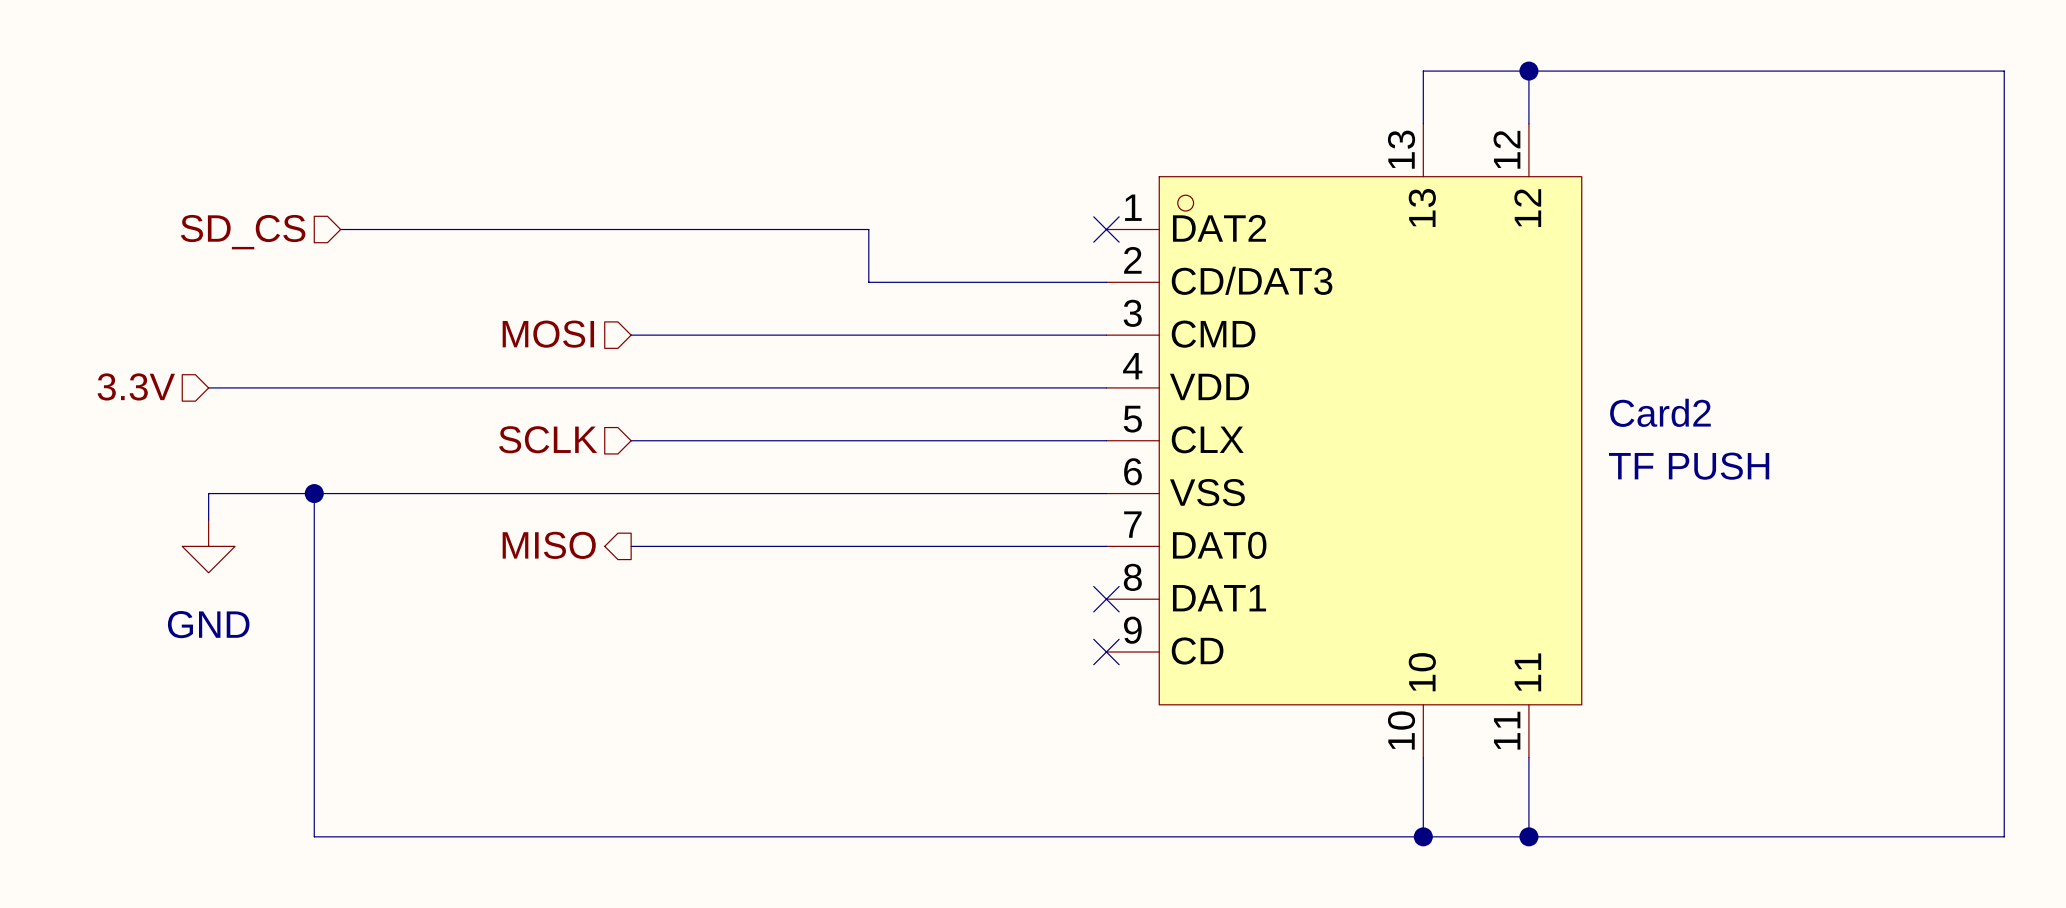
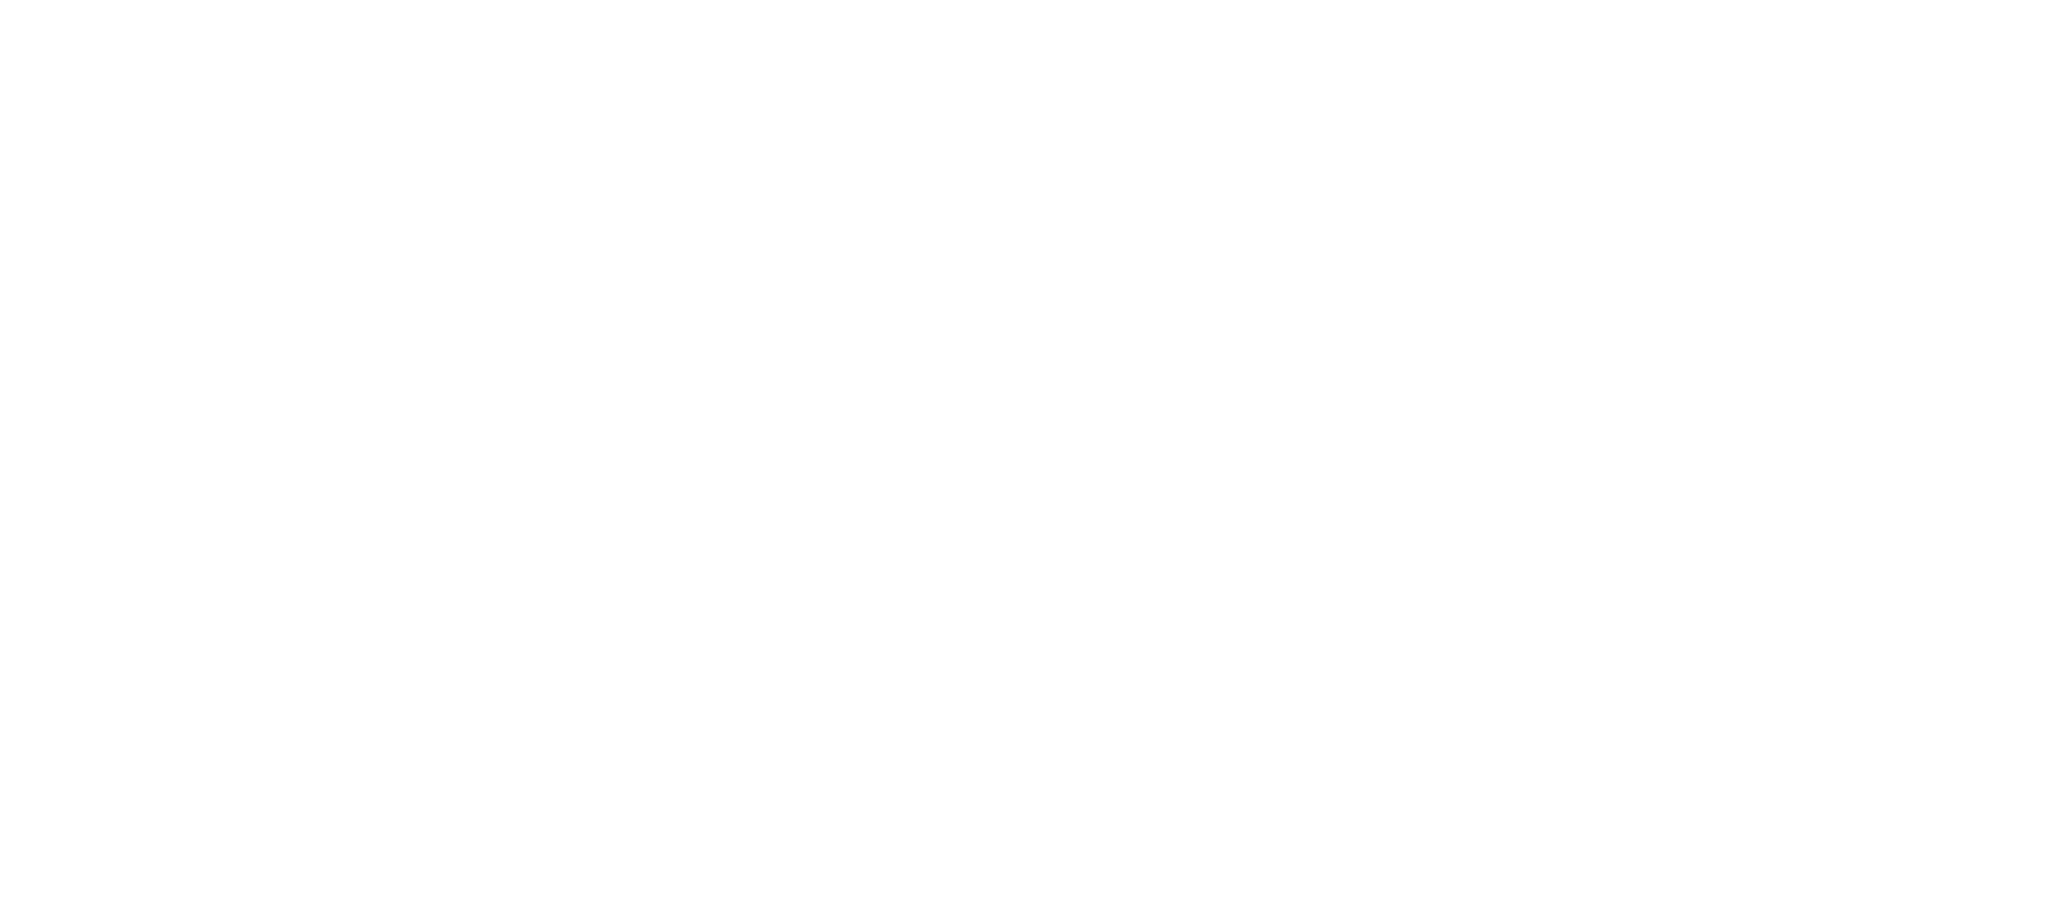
wire: (1528, 71) (1528, 123) -> none
junction: (1528, 71) -> none
wire: (1423, 123) (1423, 71) (2004, 71) (2004, 836) (314, 836) (314, 493) -> none
wire: (340, 229) (868, 229) (868, 282) (1106, 282) -> none
no-connect mark: (1106, 229) -> none
hierarchical label: SD_CS (243, 232) -> none
hierarchical label: MOSI (548, 334) -> none
wire: (631, 335) (1106, 335) -> none
hierarchical label: 3.3V (136, 386) -> none
wire: (208, 387) (1106, 387) -> none
hierarchical label: SCLK (548, 439) -> none
wire: (631, 440) (1106, 440) -> none
Card2: TF PUSH (1344, 440) -> none
junction: (314, 493) -> none
wire: (1106, 493) (208, 493) (208, 519) -> none
hierarchical label: MISO (549, 545) -> none
power symbol: GND (208, 546) -> none
wire: (631, 546) (1106, 546) -> none
no-connect mark: (1106, 599) -> none
no-connect mark: (1106, 652) -> none
wire: (1423, 757) (1423, 836) -> none
wire: (1528, 757) (1528, 836) -> none
junction: (1423, 836) -> none
junction: (1528, 836) -> none

